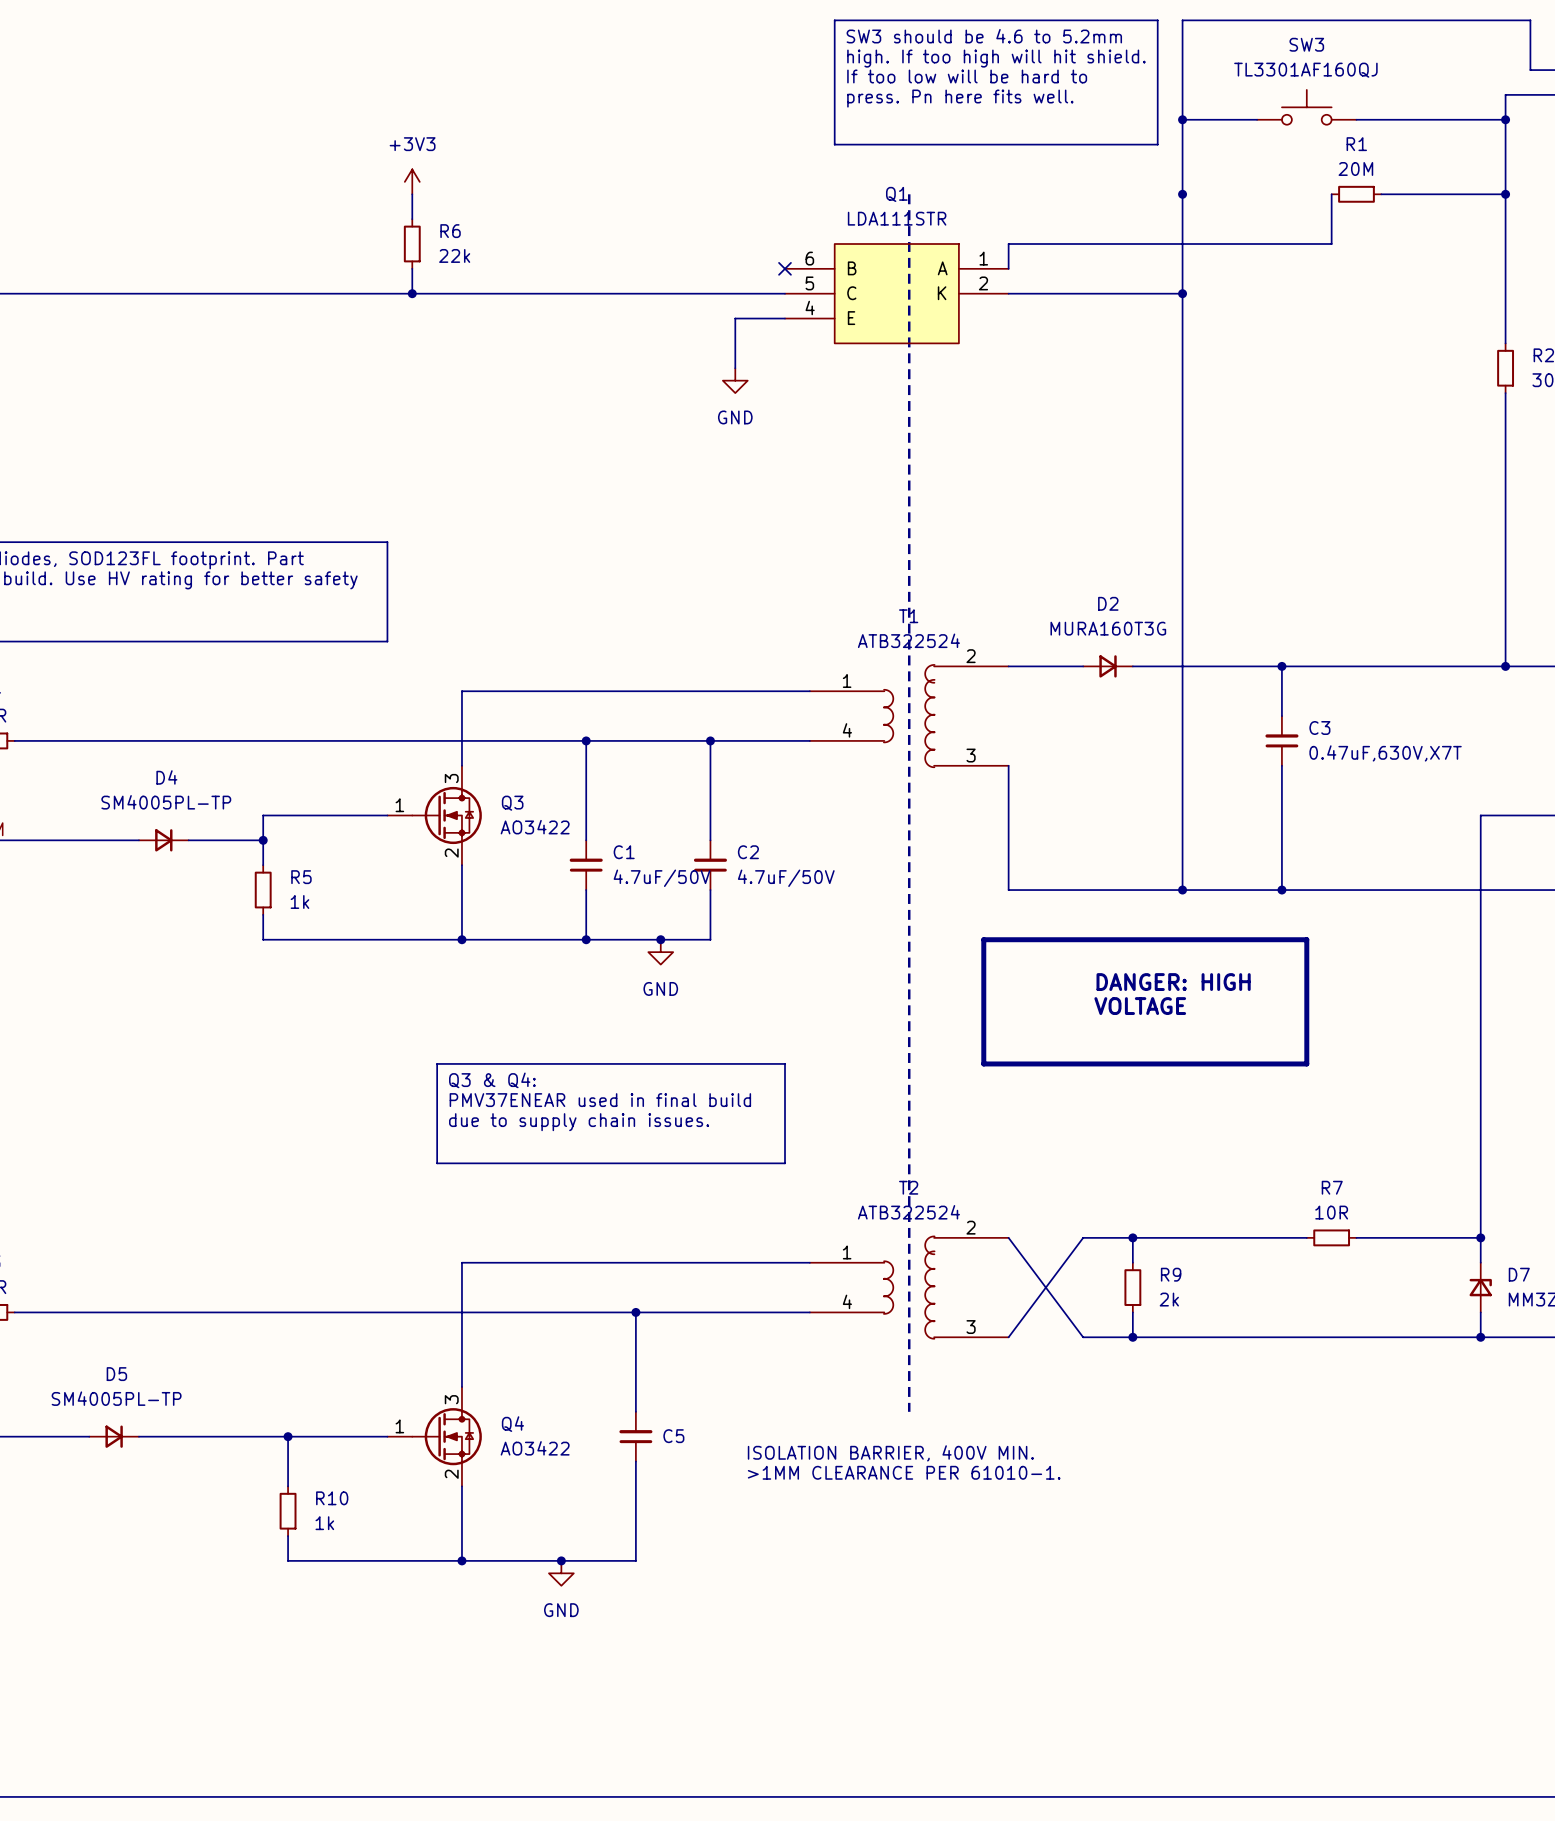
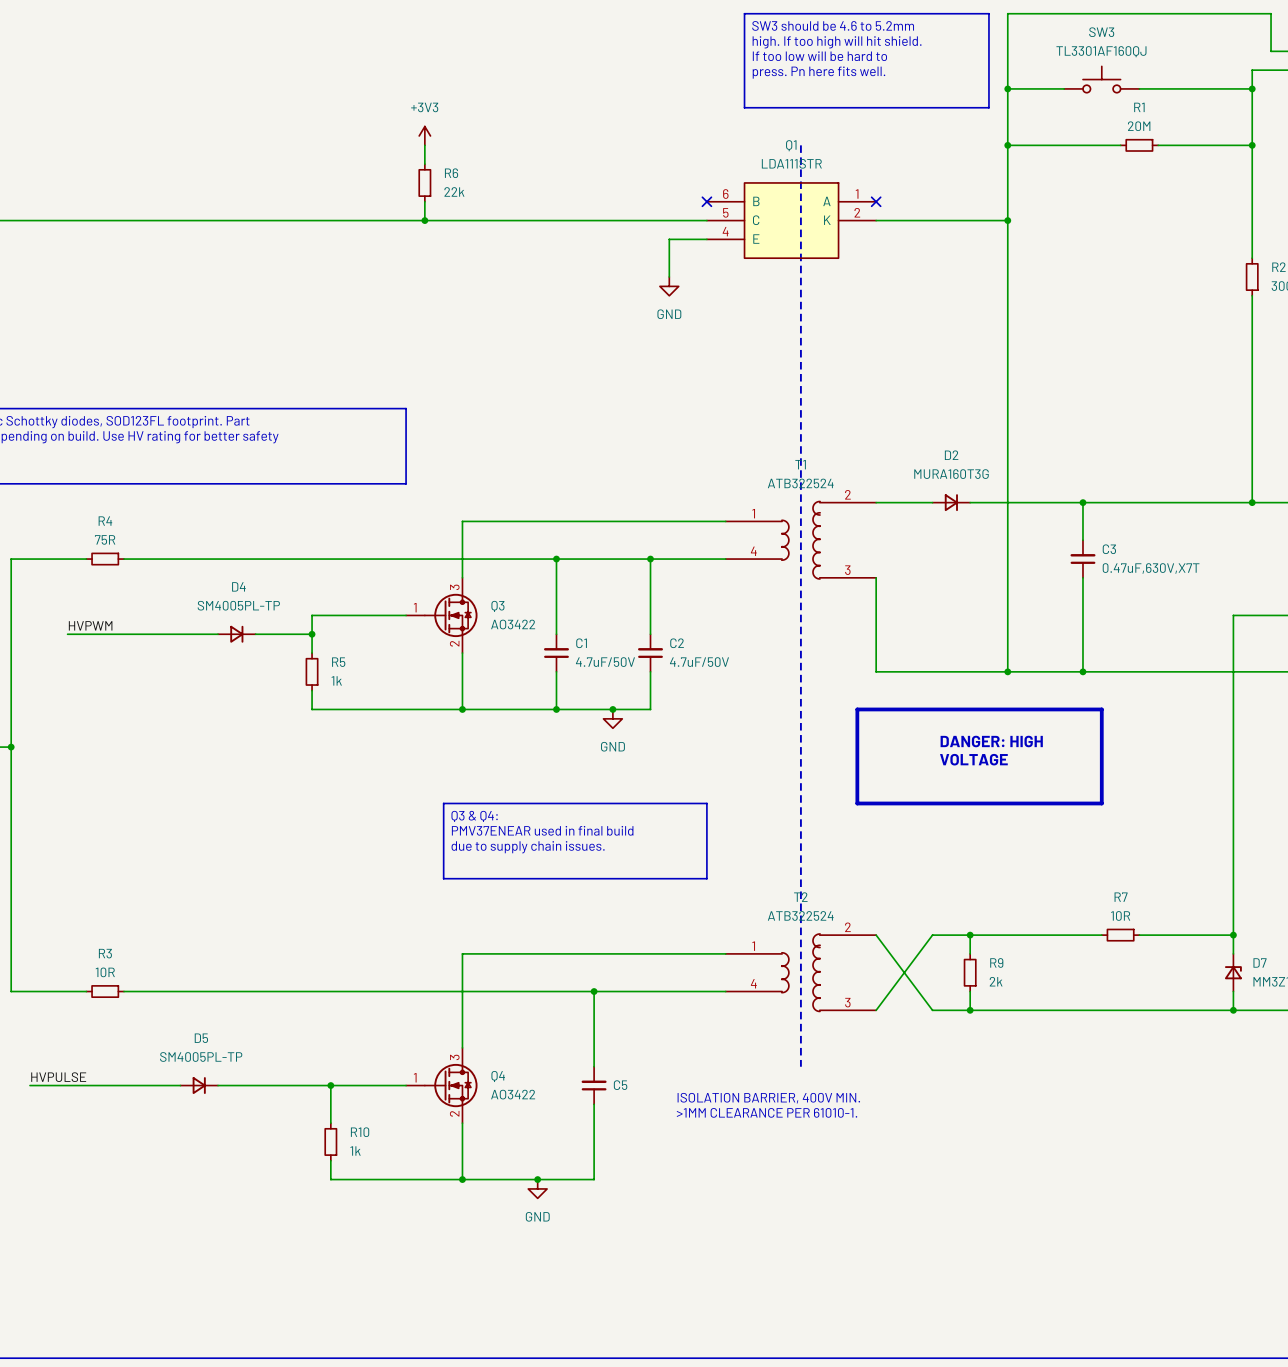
wire: (1331, 194) (1331, 244) (1008, 244) (1008, 268) -> (1120, 145) (1007, 145)
no-connect mark: none -> (876, 201)

